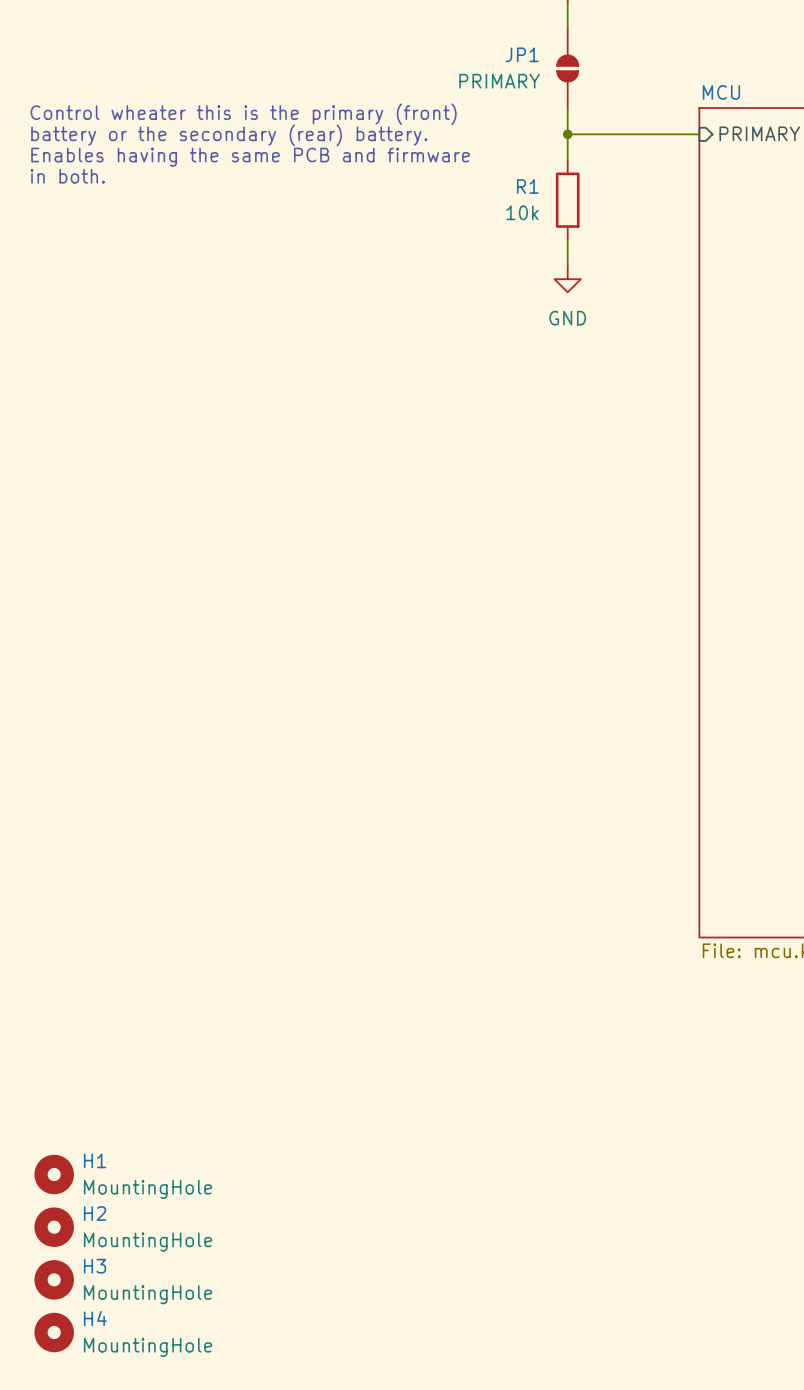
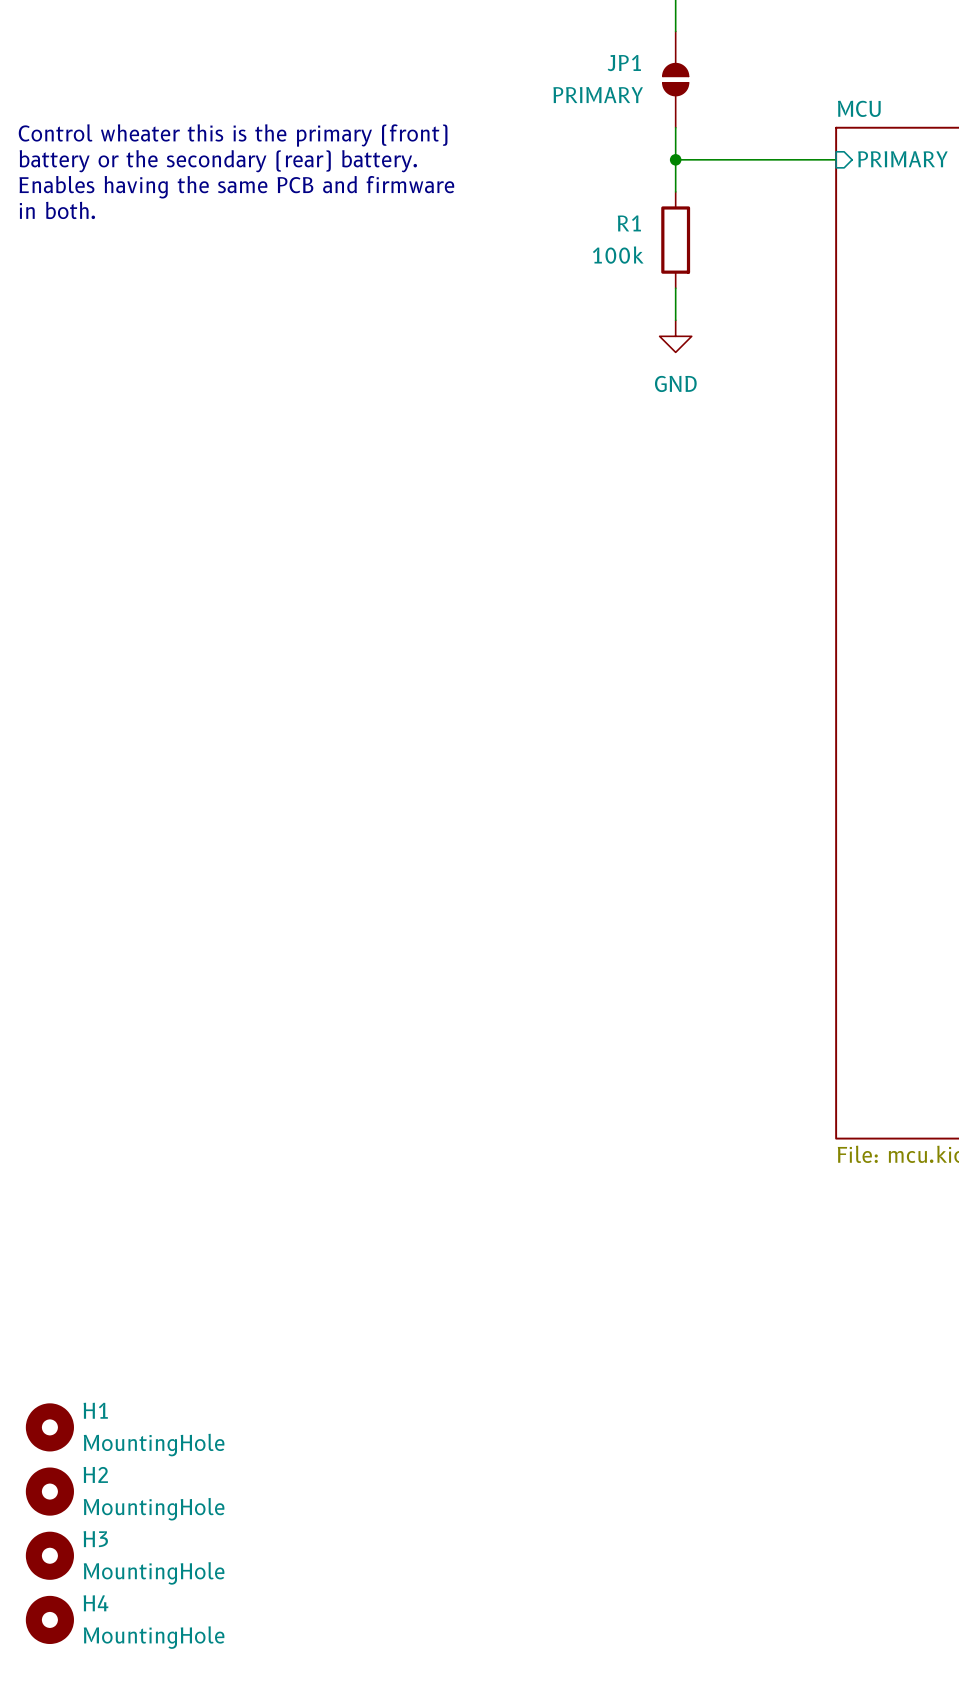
R1 value: 10k (522, 212) -> 100k (618, 255)

